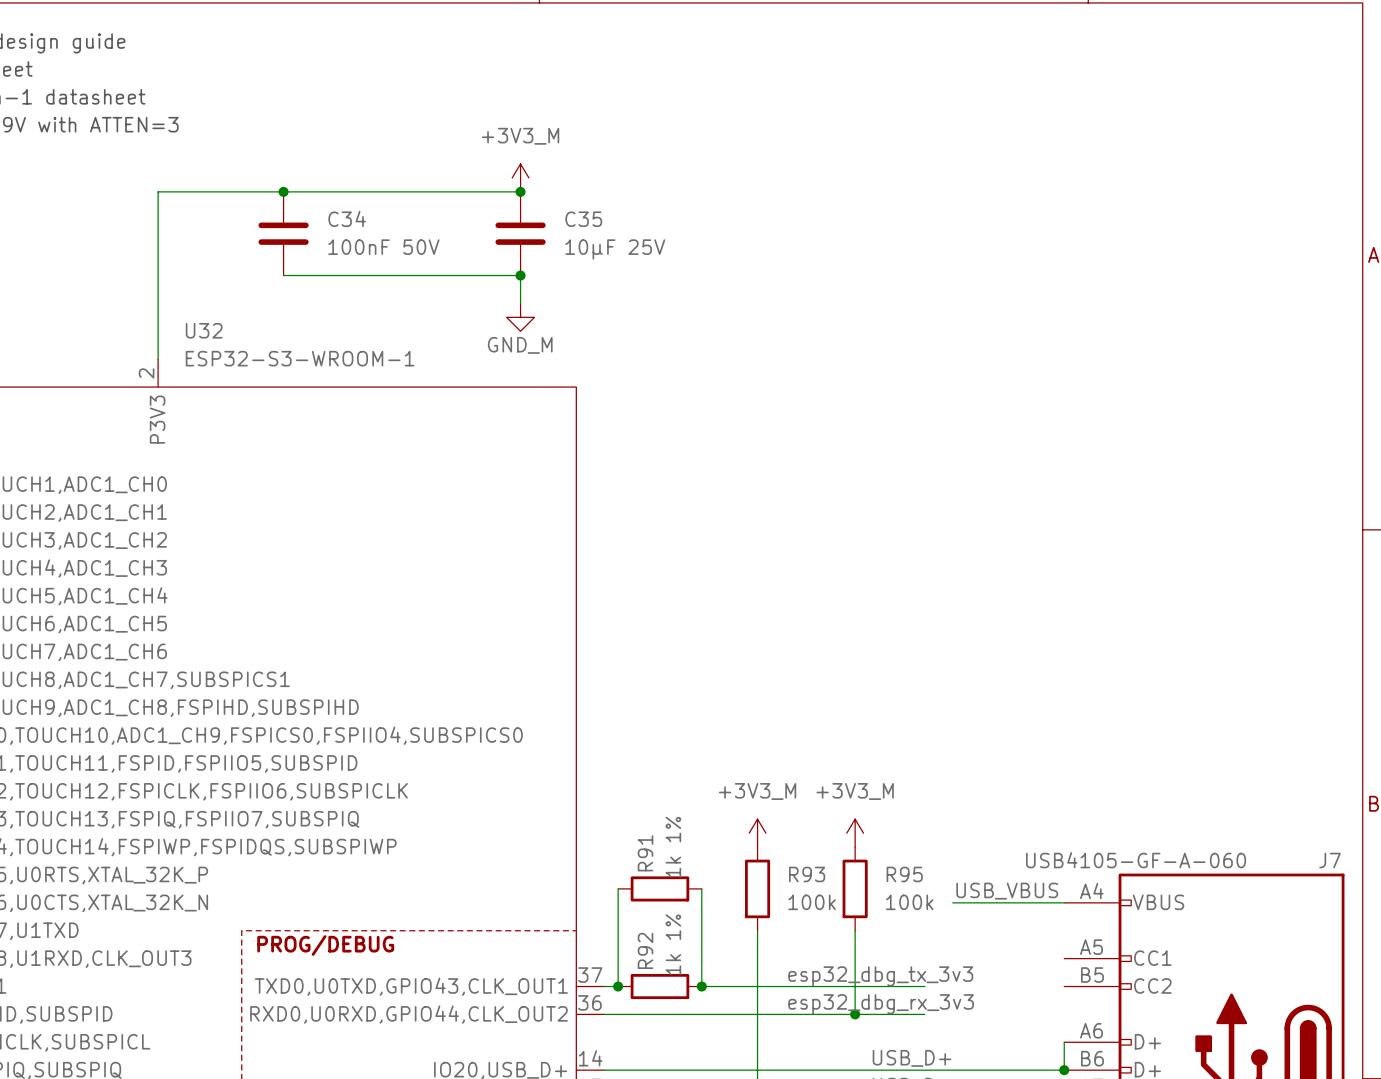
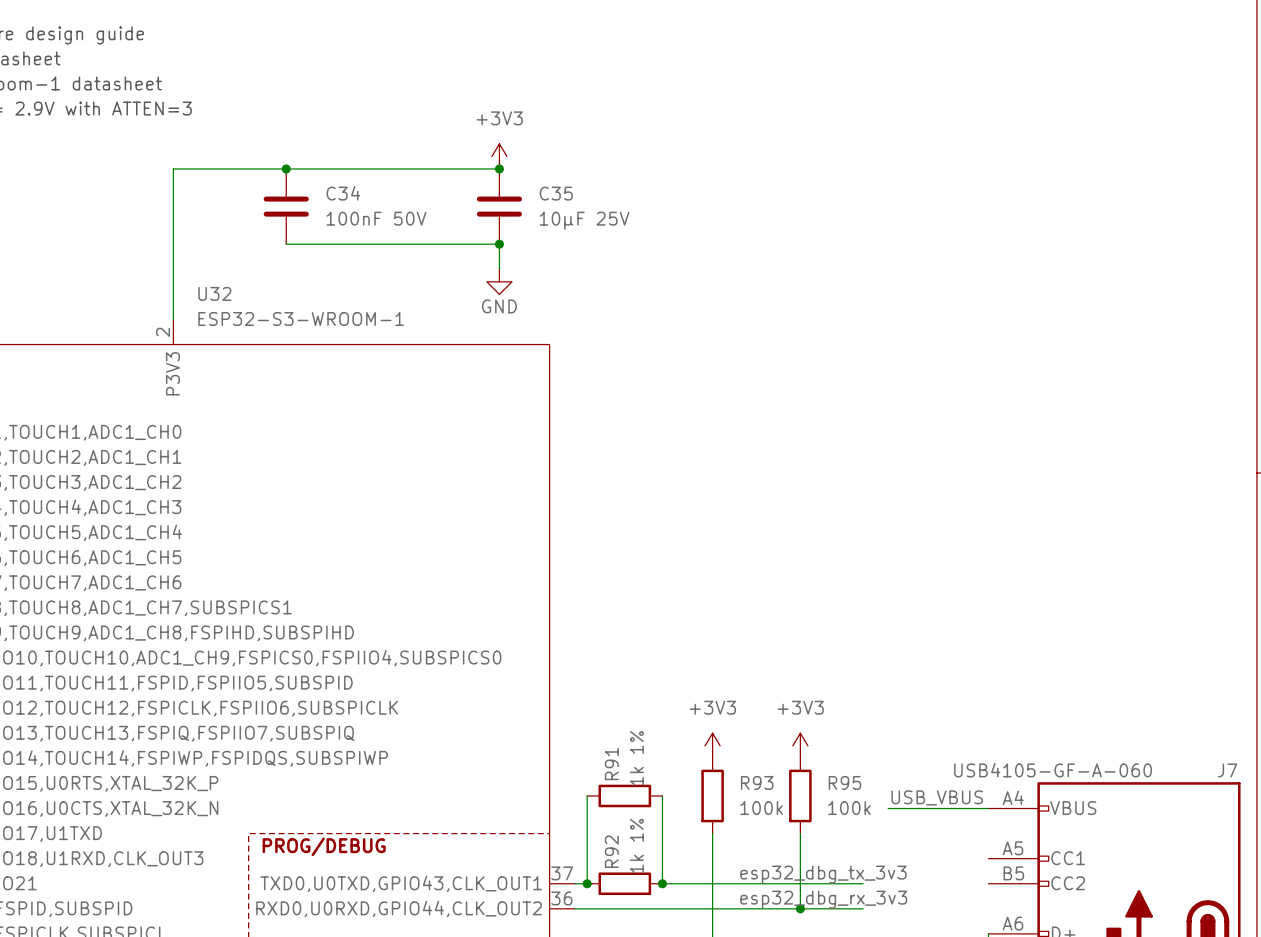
power symbol: +3V3_M (520, 177) -> +3V3 (499, 156)
power symbol: GND_M (520, 317) -> GND (499, 281)
power symbol: +3V3_M (757, 833) -> +3V3 (712, 745)
power symbol: +3V3_M (855, 833) -> +3V3 (800, 745)

